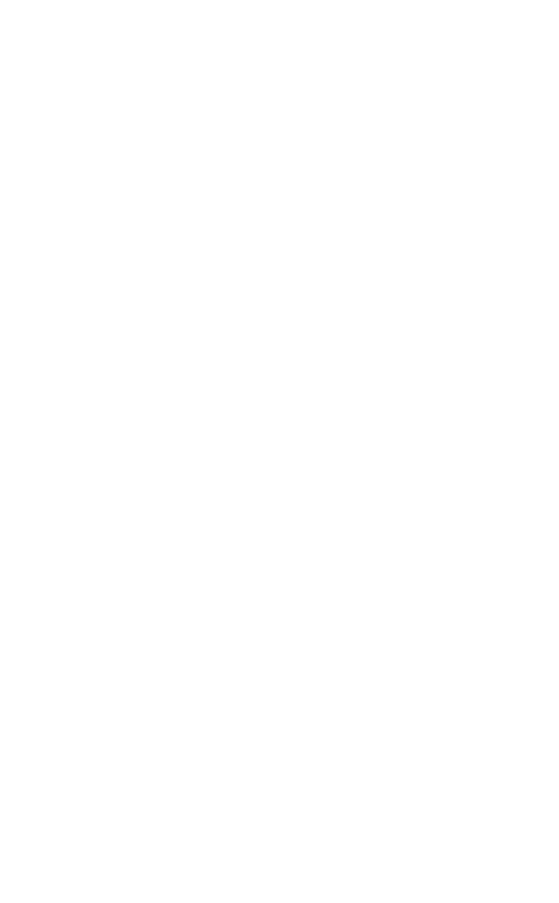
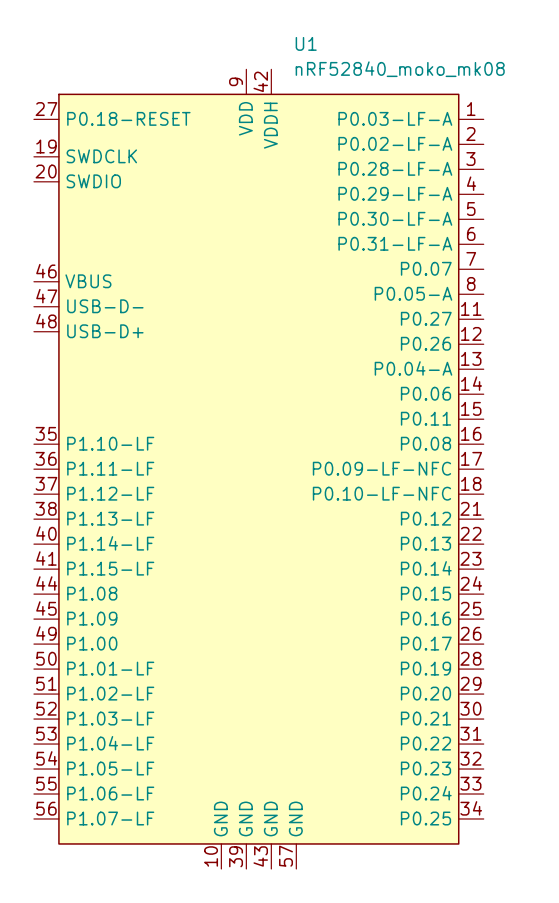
U1: none -> nRF52840_moko_mk08 (258, 469)

